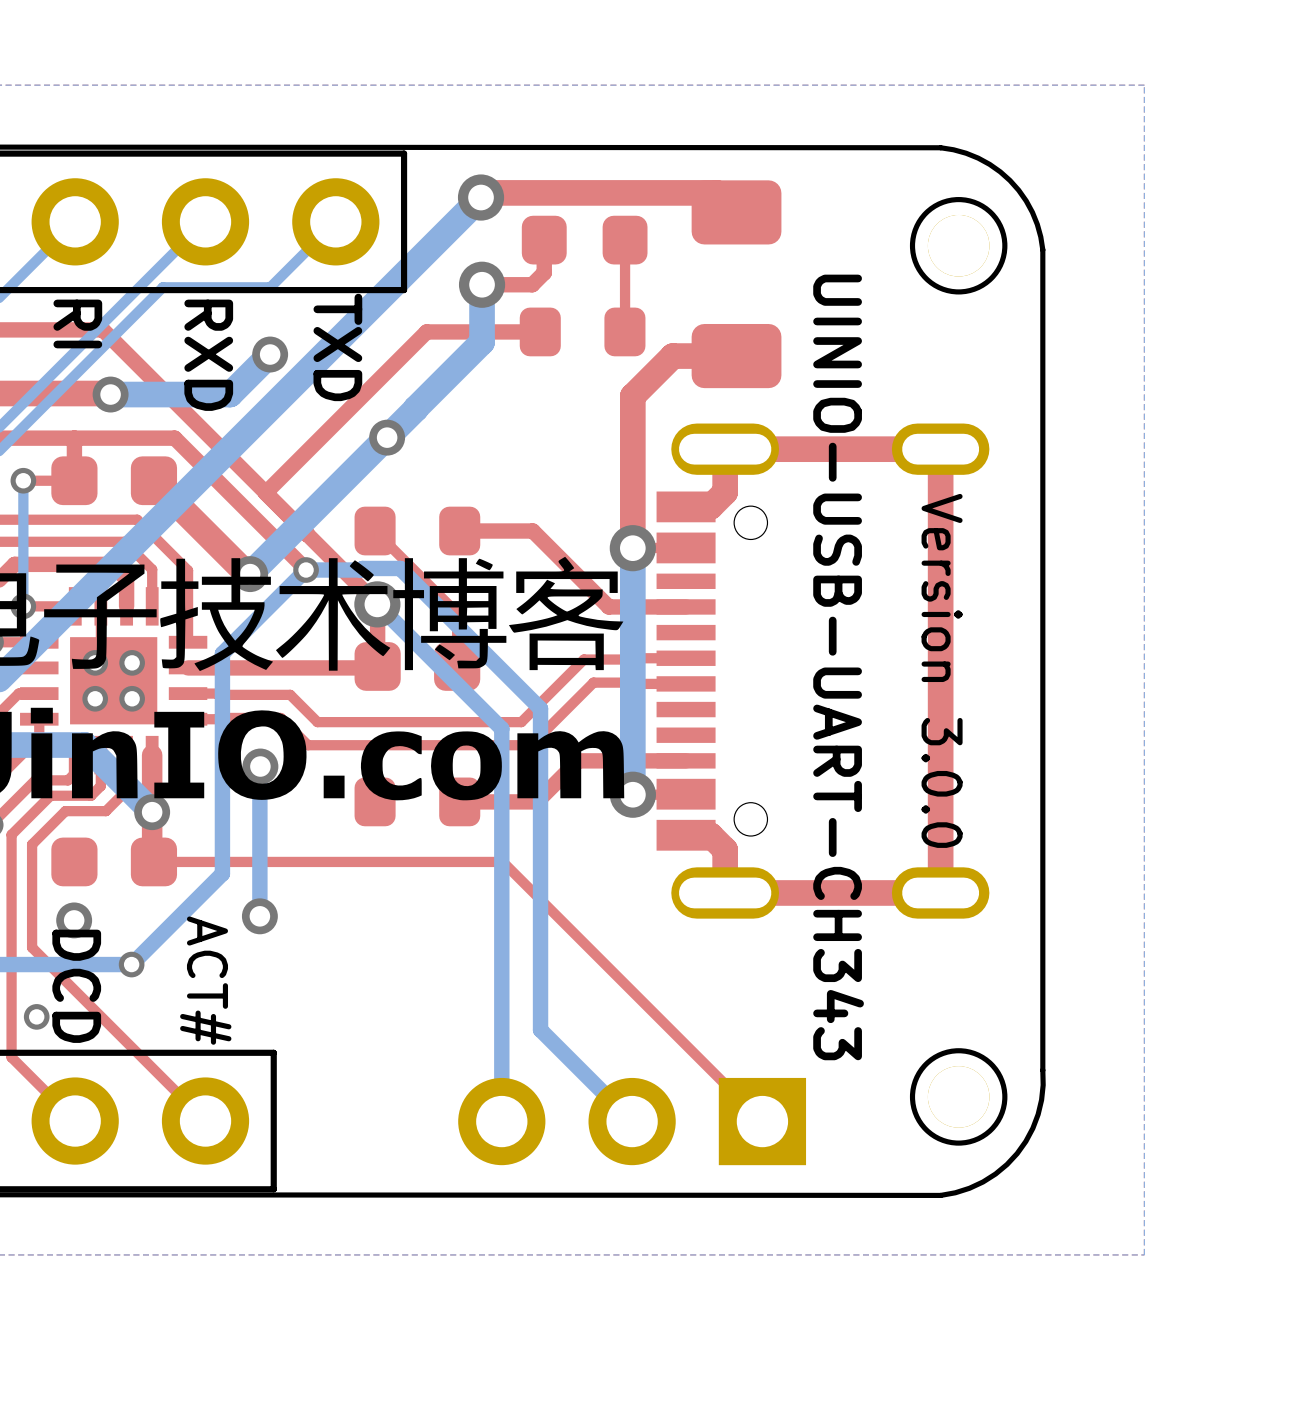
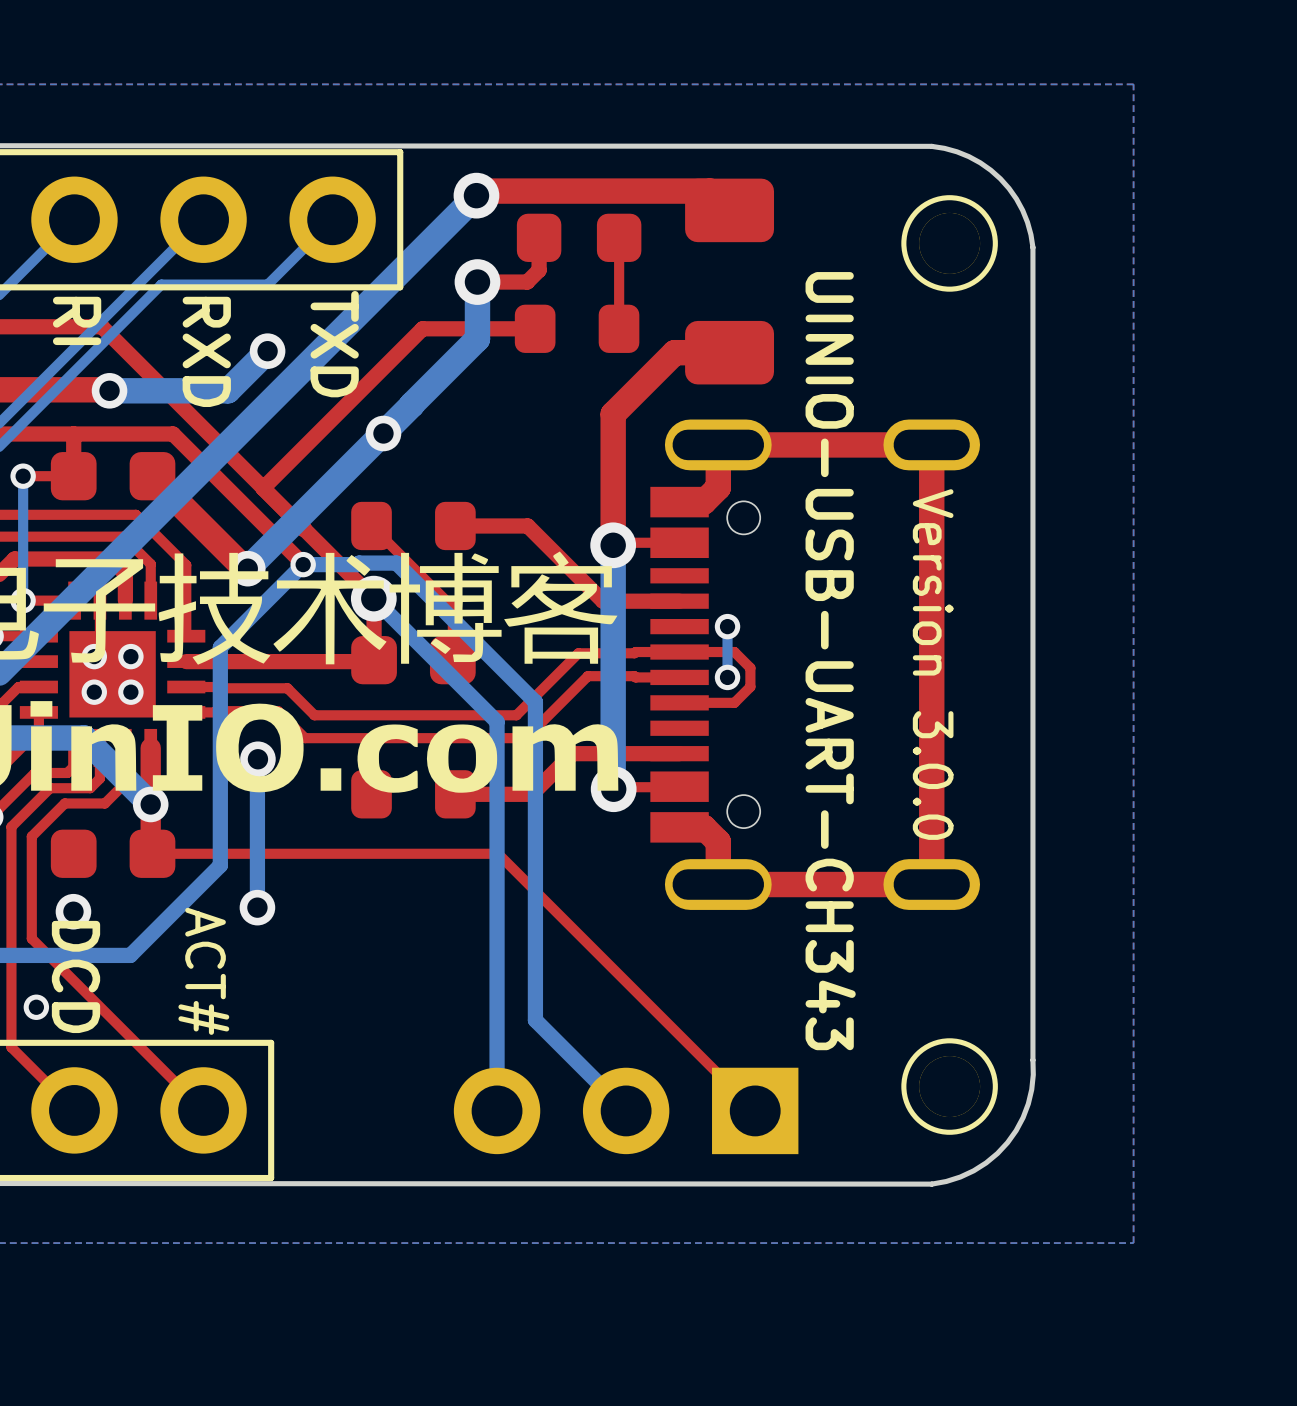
top track: (681, 356) (672, 356) (632, 396) (632, 548) (648, 547) -> (674, 352) (613, 414) (613, 545) (615, 542) (642, 542)
bottom track: (632, 548) (632, 794) -> (613, 545) (613, 788)
via position: (632, 548) -> (613, 545)
bottom track: none -> (727, 626) (727, 677)
via: none -> (727, 626)
top track: none -> (679, 652) (734, 652) (750, 667) (750, 686) (734, 702) (679, 702)
via: none -> (727, 677)
via position: (632, 794) -> (613, 789)
via: (131, 964) -> none

